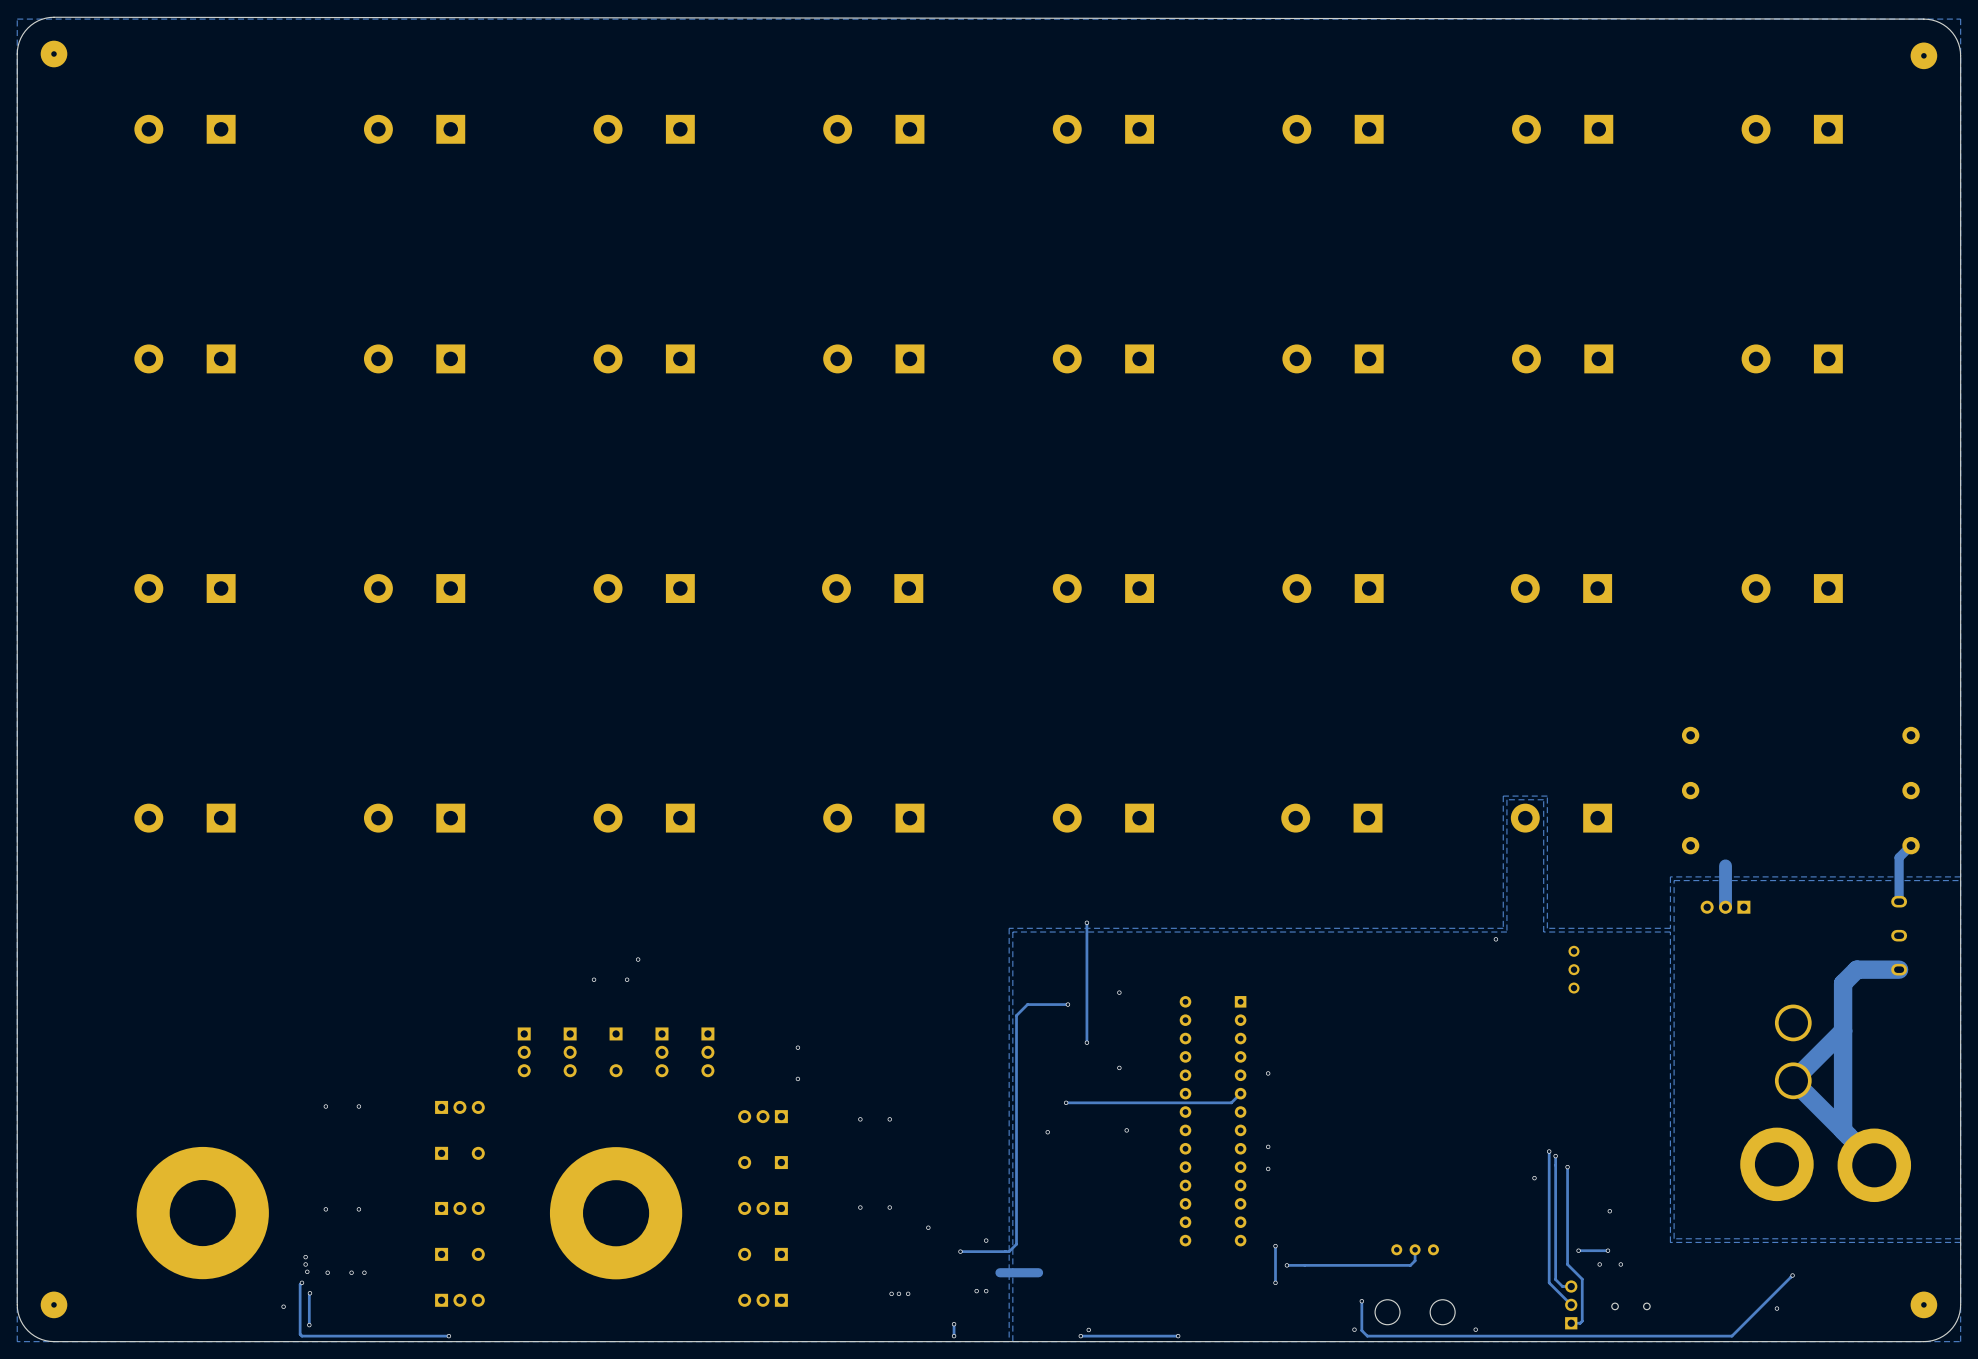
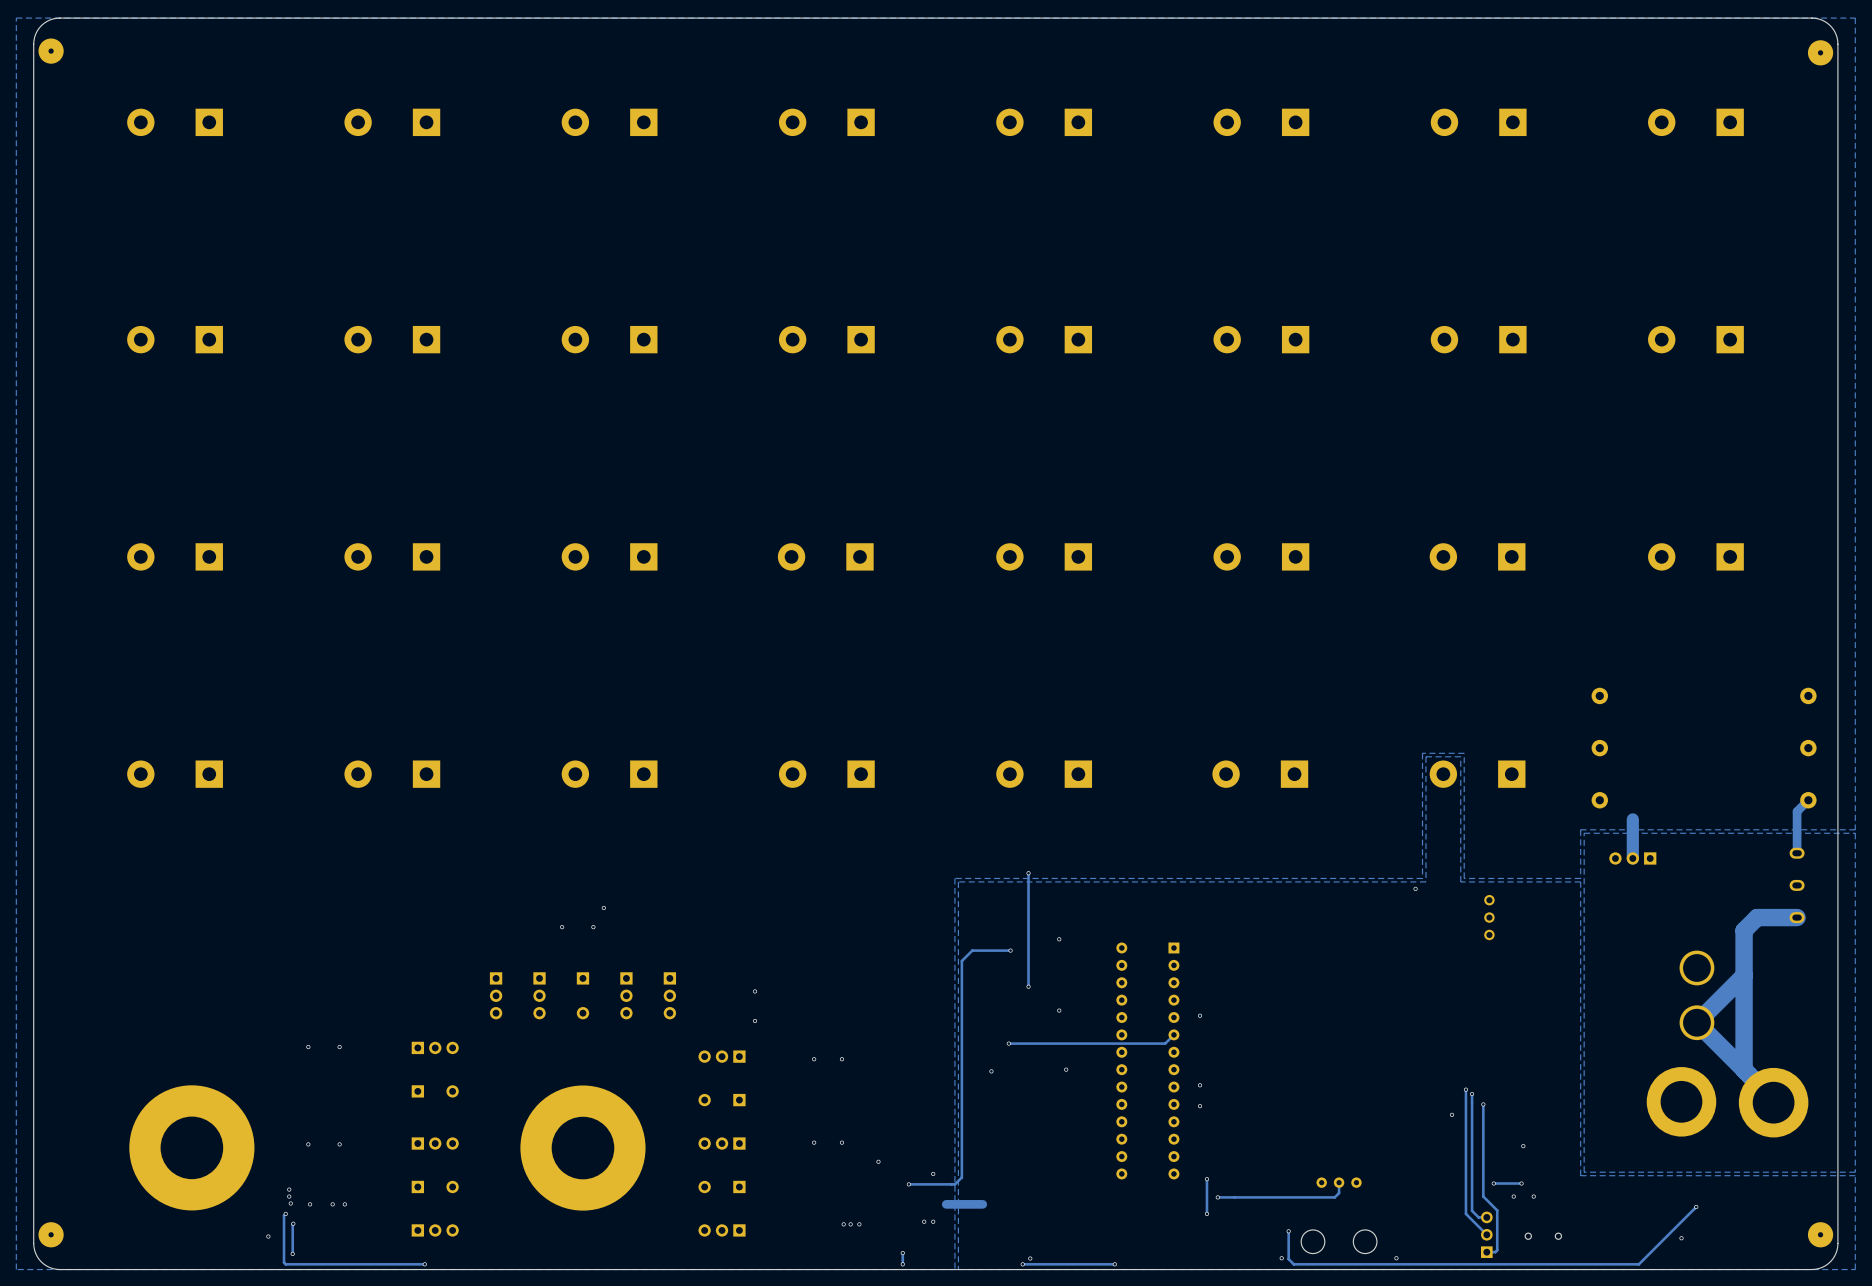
board edge: (1914, 1341) (1932, 1340) (1946, 1333) (1957, 1320) (1960, 1304) (1960, 55) (1957, 39) (1946, 27) (1936, 21) (1923, 19) (53, 17) (41, 19) (28, 28) (20, 38) (17, 53) (17, 1304) (20, 1320) (31, 1333) (45, 1340) (63, 1341) -> (1811, 1269) (1821, 1267) (1830, 1261) (1835, 1253) (1837, 1243) (1837, 44) (1835, 34) (1830, 25) (1821, 20) (1811, 18) (59, 18) (43, 23) (37, 31) (33, 44) (33, 1243) (35, 1253) (41, 1261) (49, 1267) (59, 1269)

